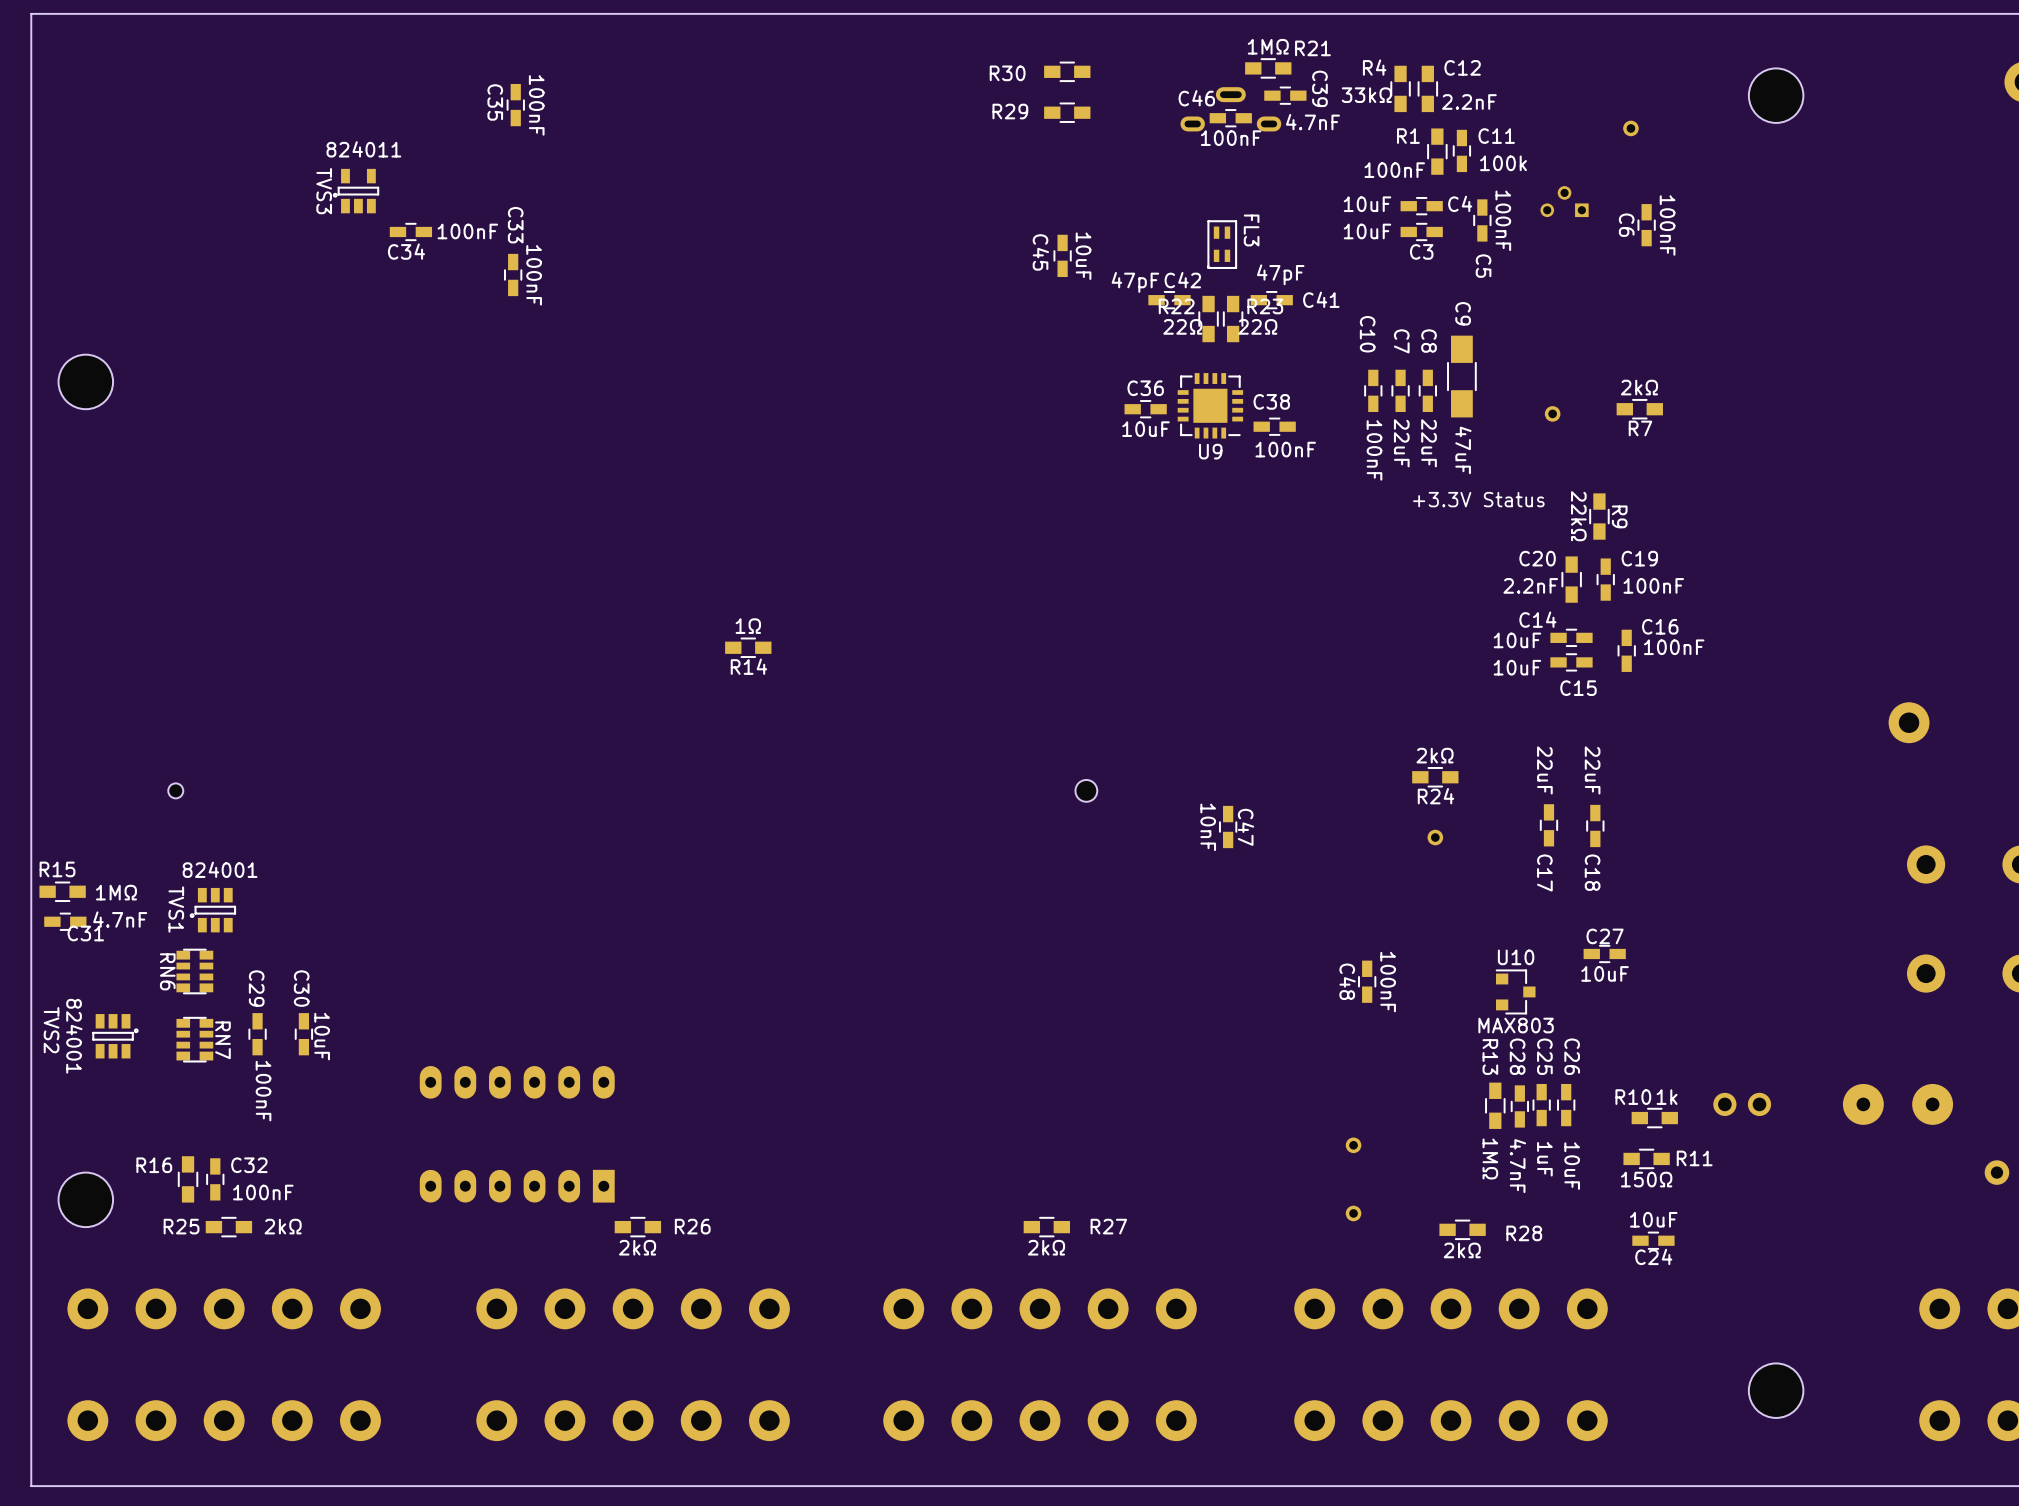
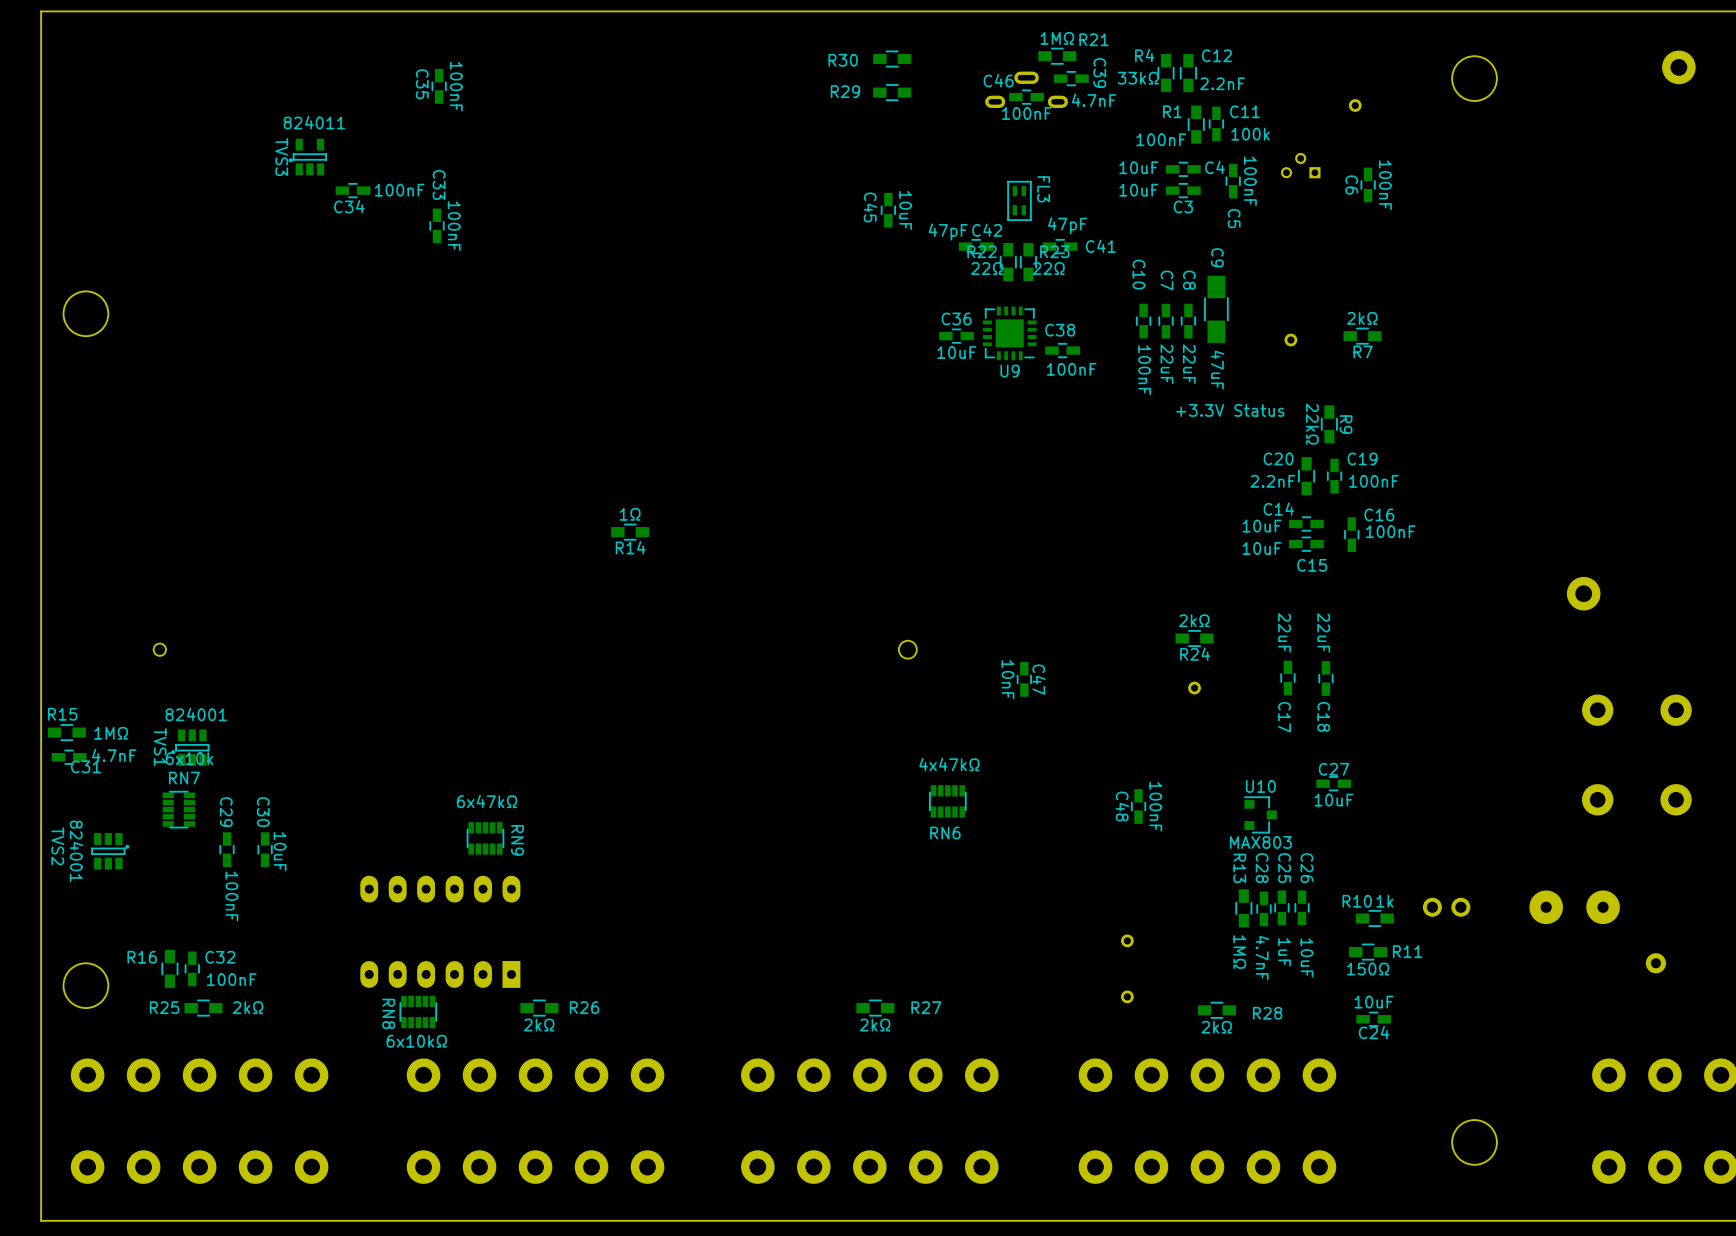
RN7 value: none -> 6x10k (189, 758)
RN6 value: none -> 4x47kΩ (949, 764)
RN6 footprint: [176, 948, 214, 995] -> [929, 785, 967, 818]
RN6 name position: RN6 (167, 971) -> RN6 (945, 833)
RN7 footprint: [176, 1016, 214, 1063] -> [162, 790, 196, 829]
RN9: none -> 6x47kΩ (485, 838)
RN7 name position: RN7 (222, 1040) -> RN7 (184, 778)
RN8: none -> 6x10kΩ (418, 1011)

